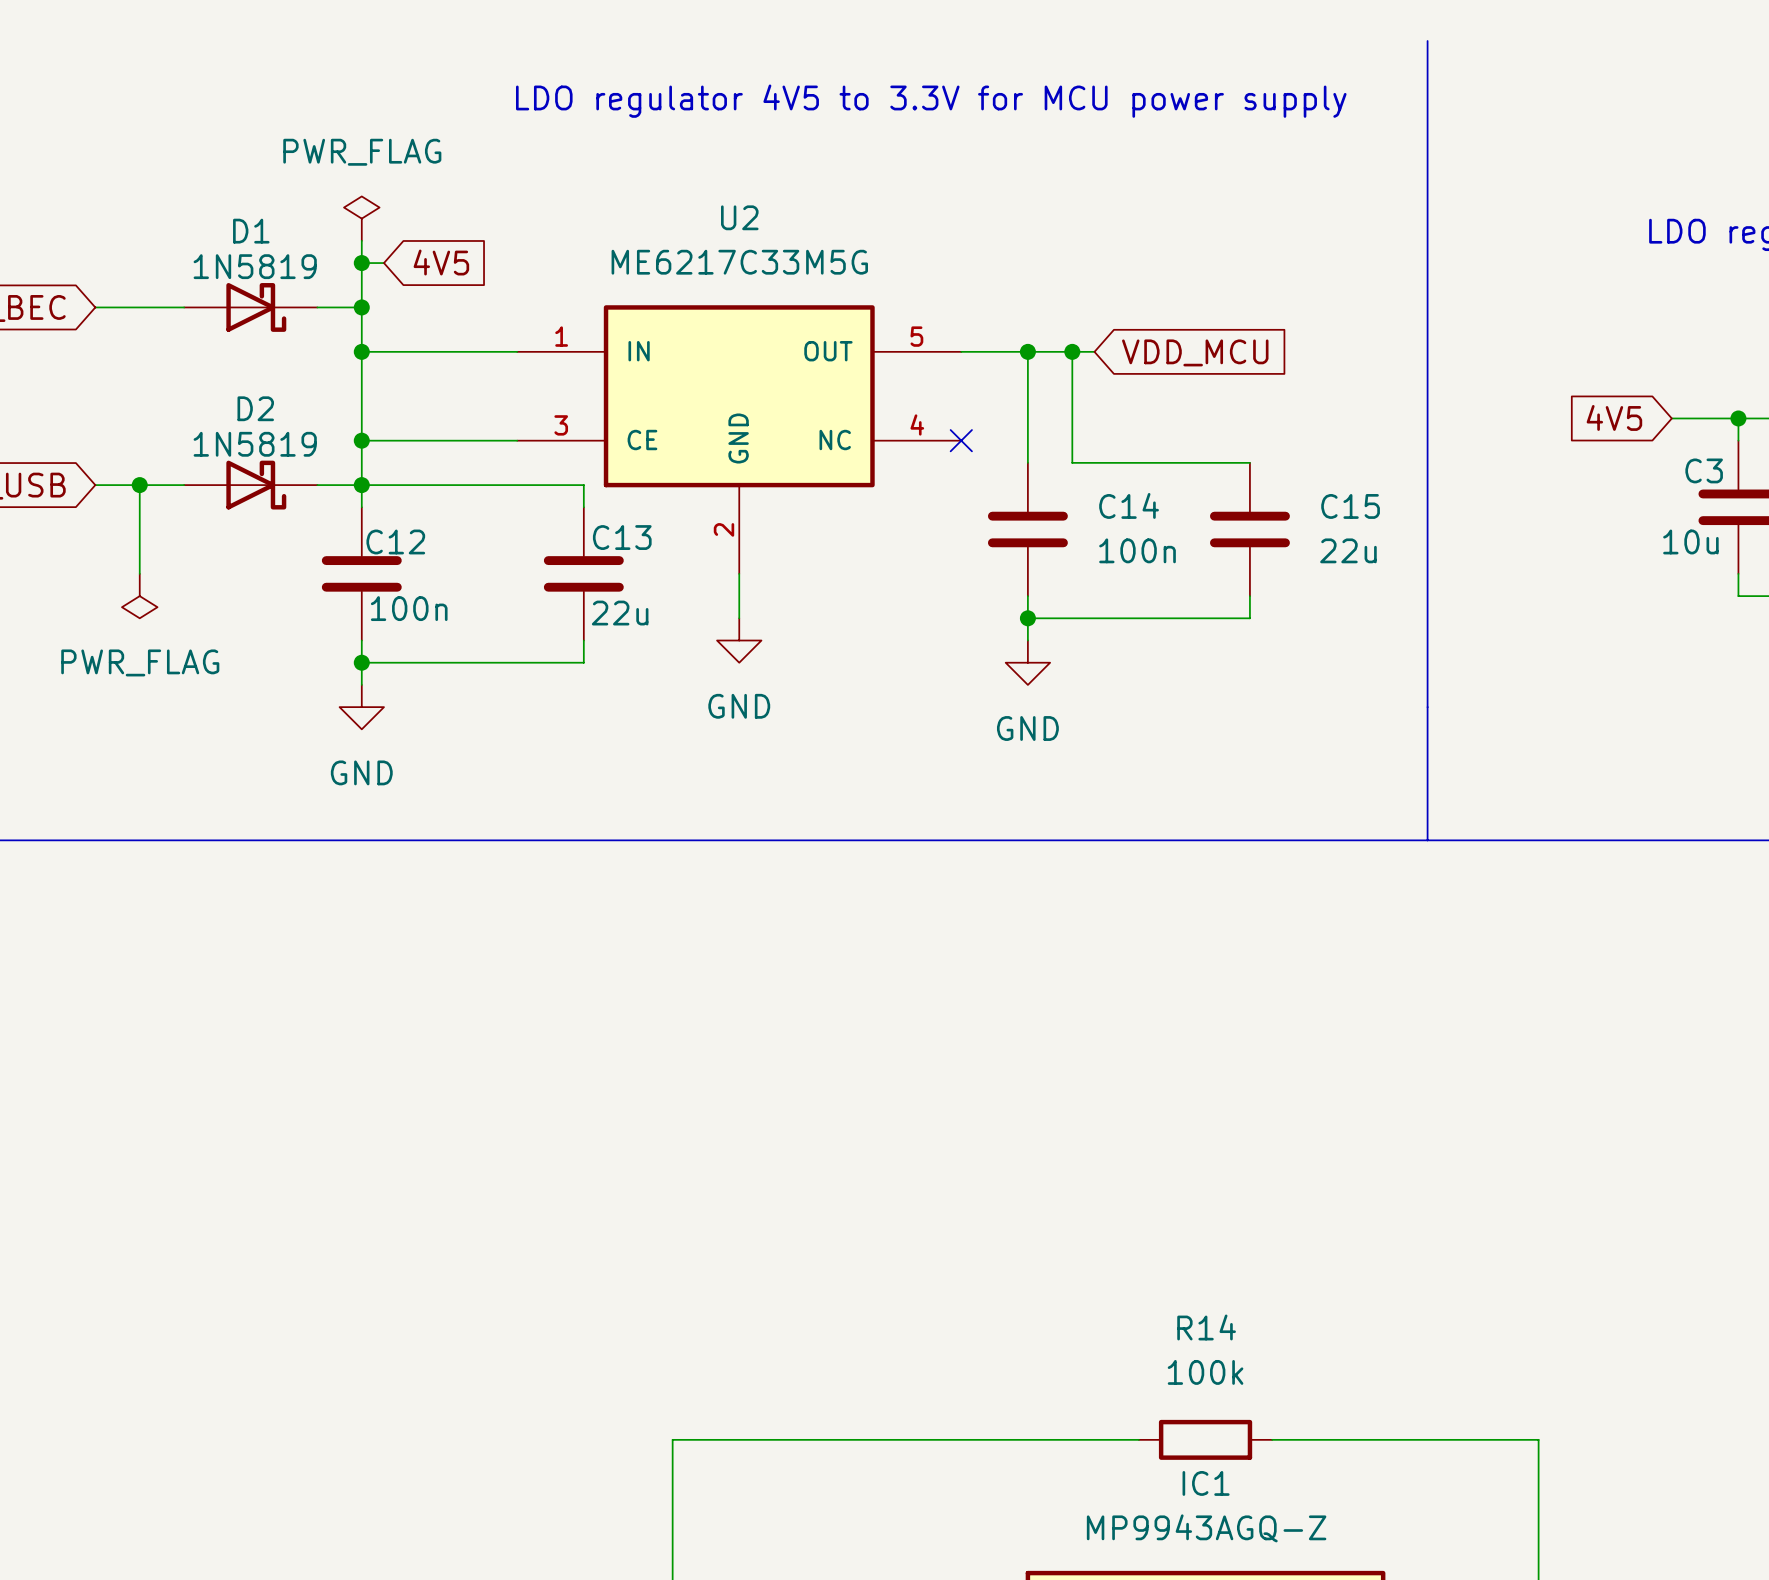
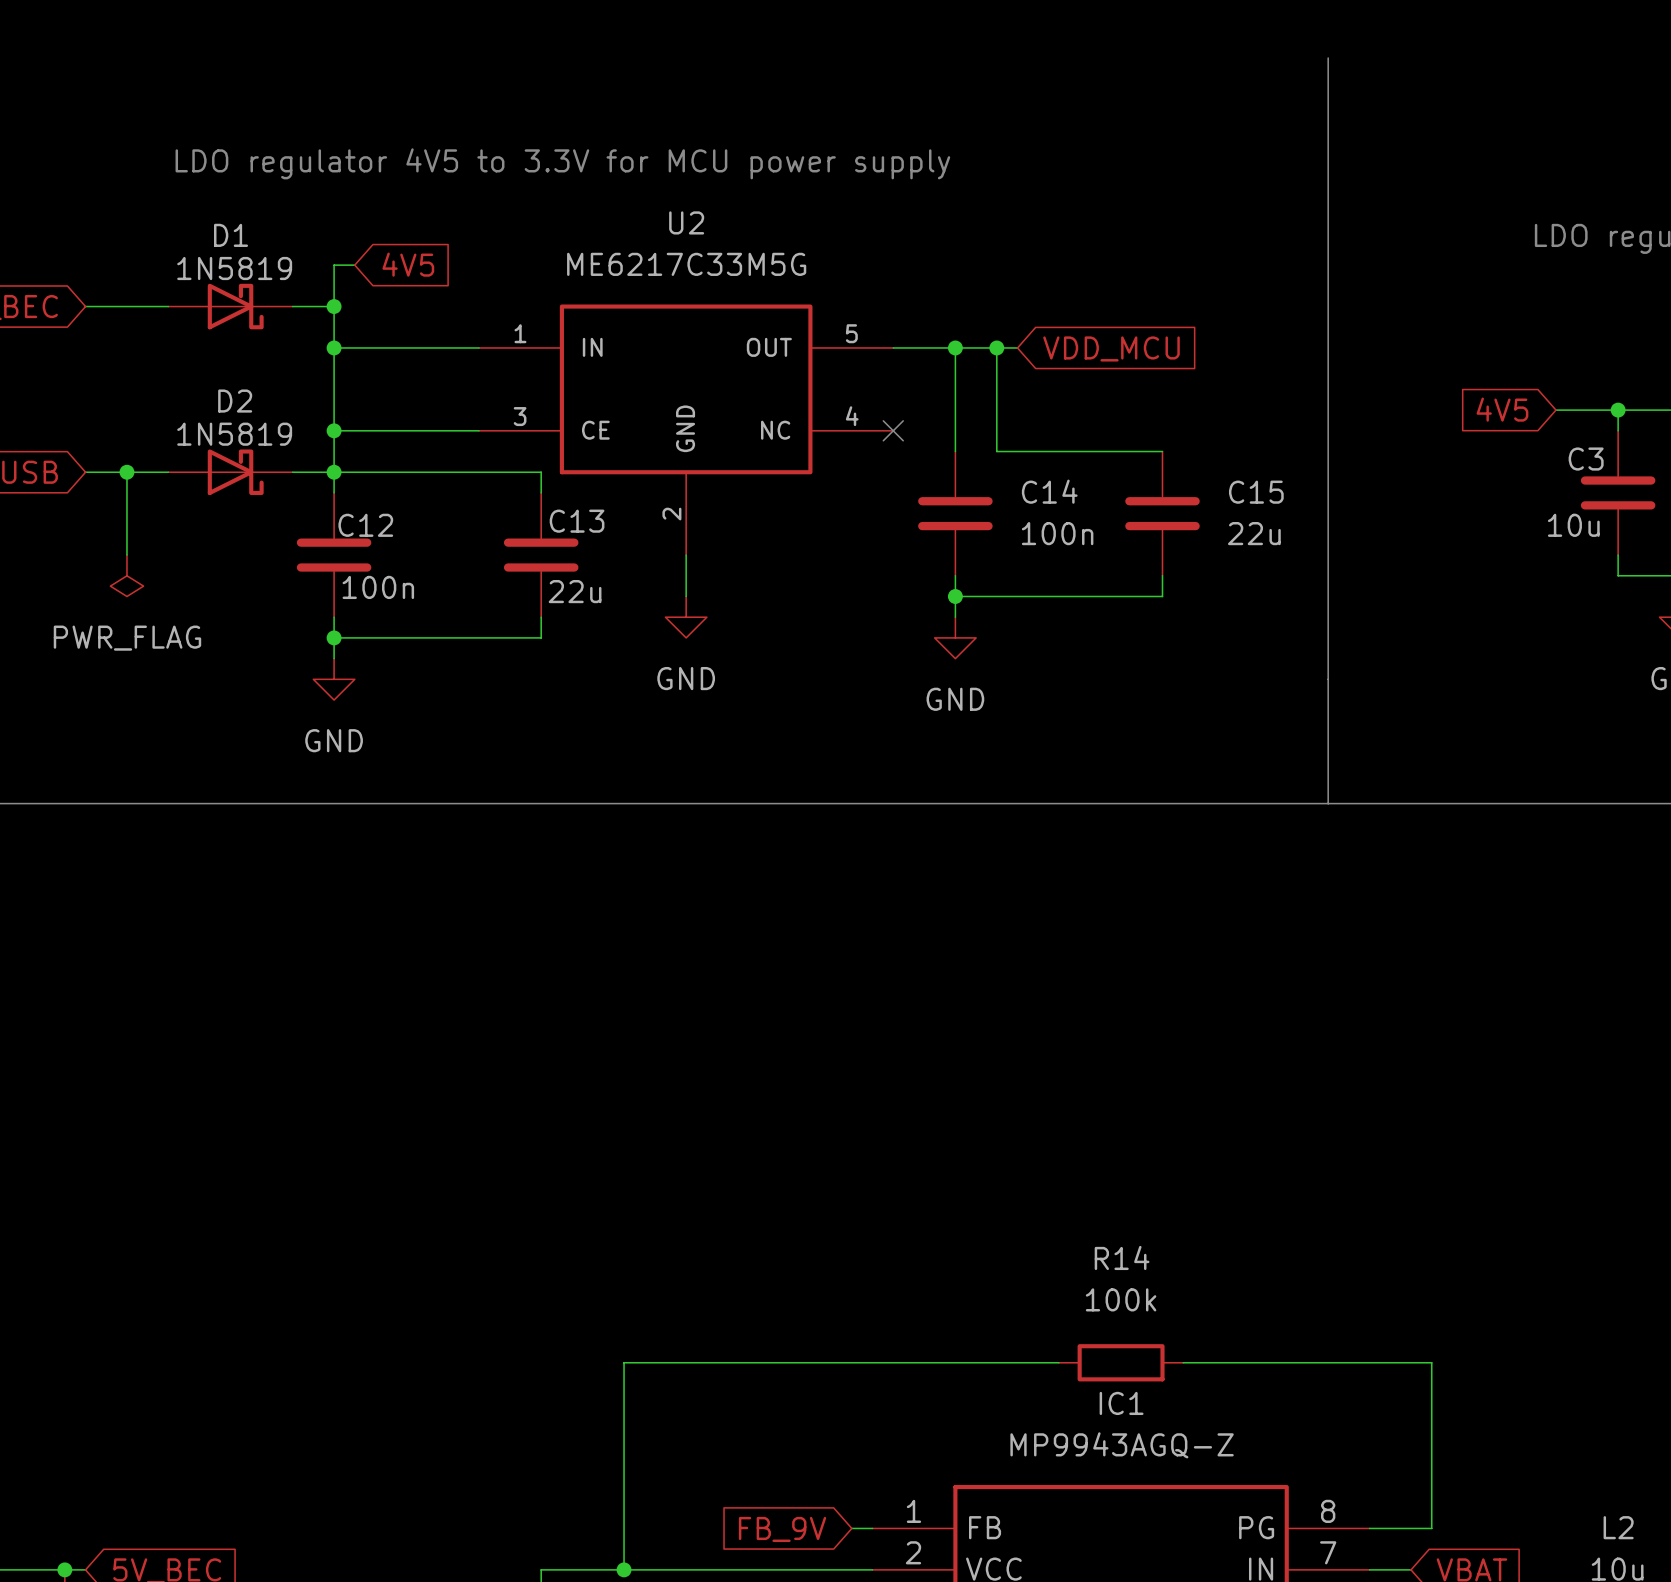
text position: LDO regulator 4V5 to 3.3V for MCU power supply (931, 101) -> LDO regulator 4V5 to 3.3V for MCU power supply (562, 163)
power symbol: PWR_FLAG (361, 218) -> none
wire: (361, 240) (361, 263) -> none
junction: (361, 263) -> none

